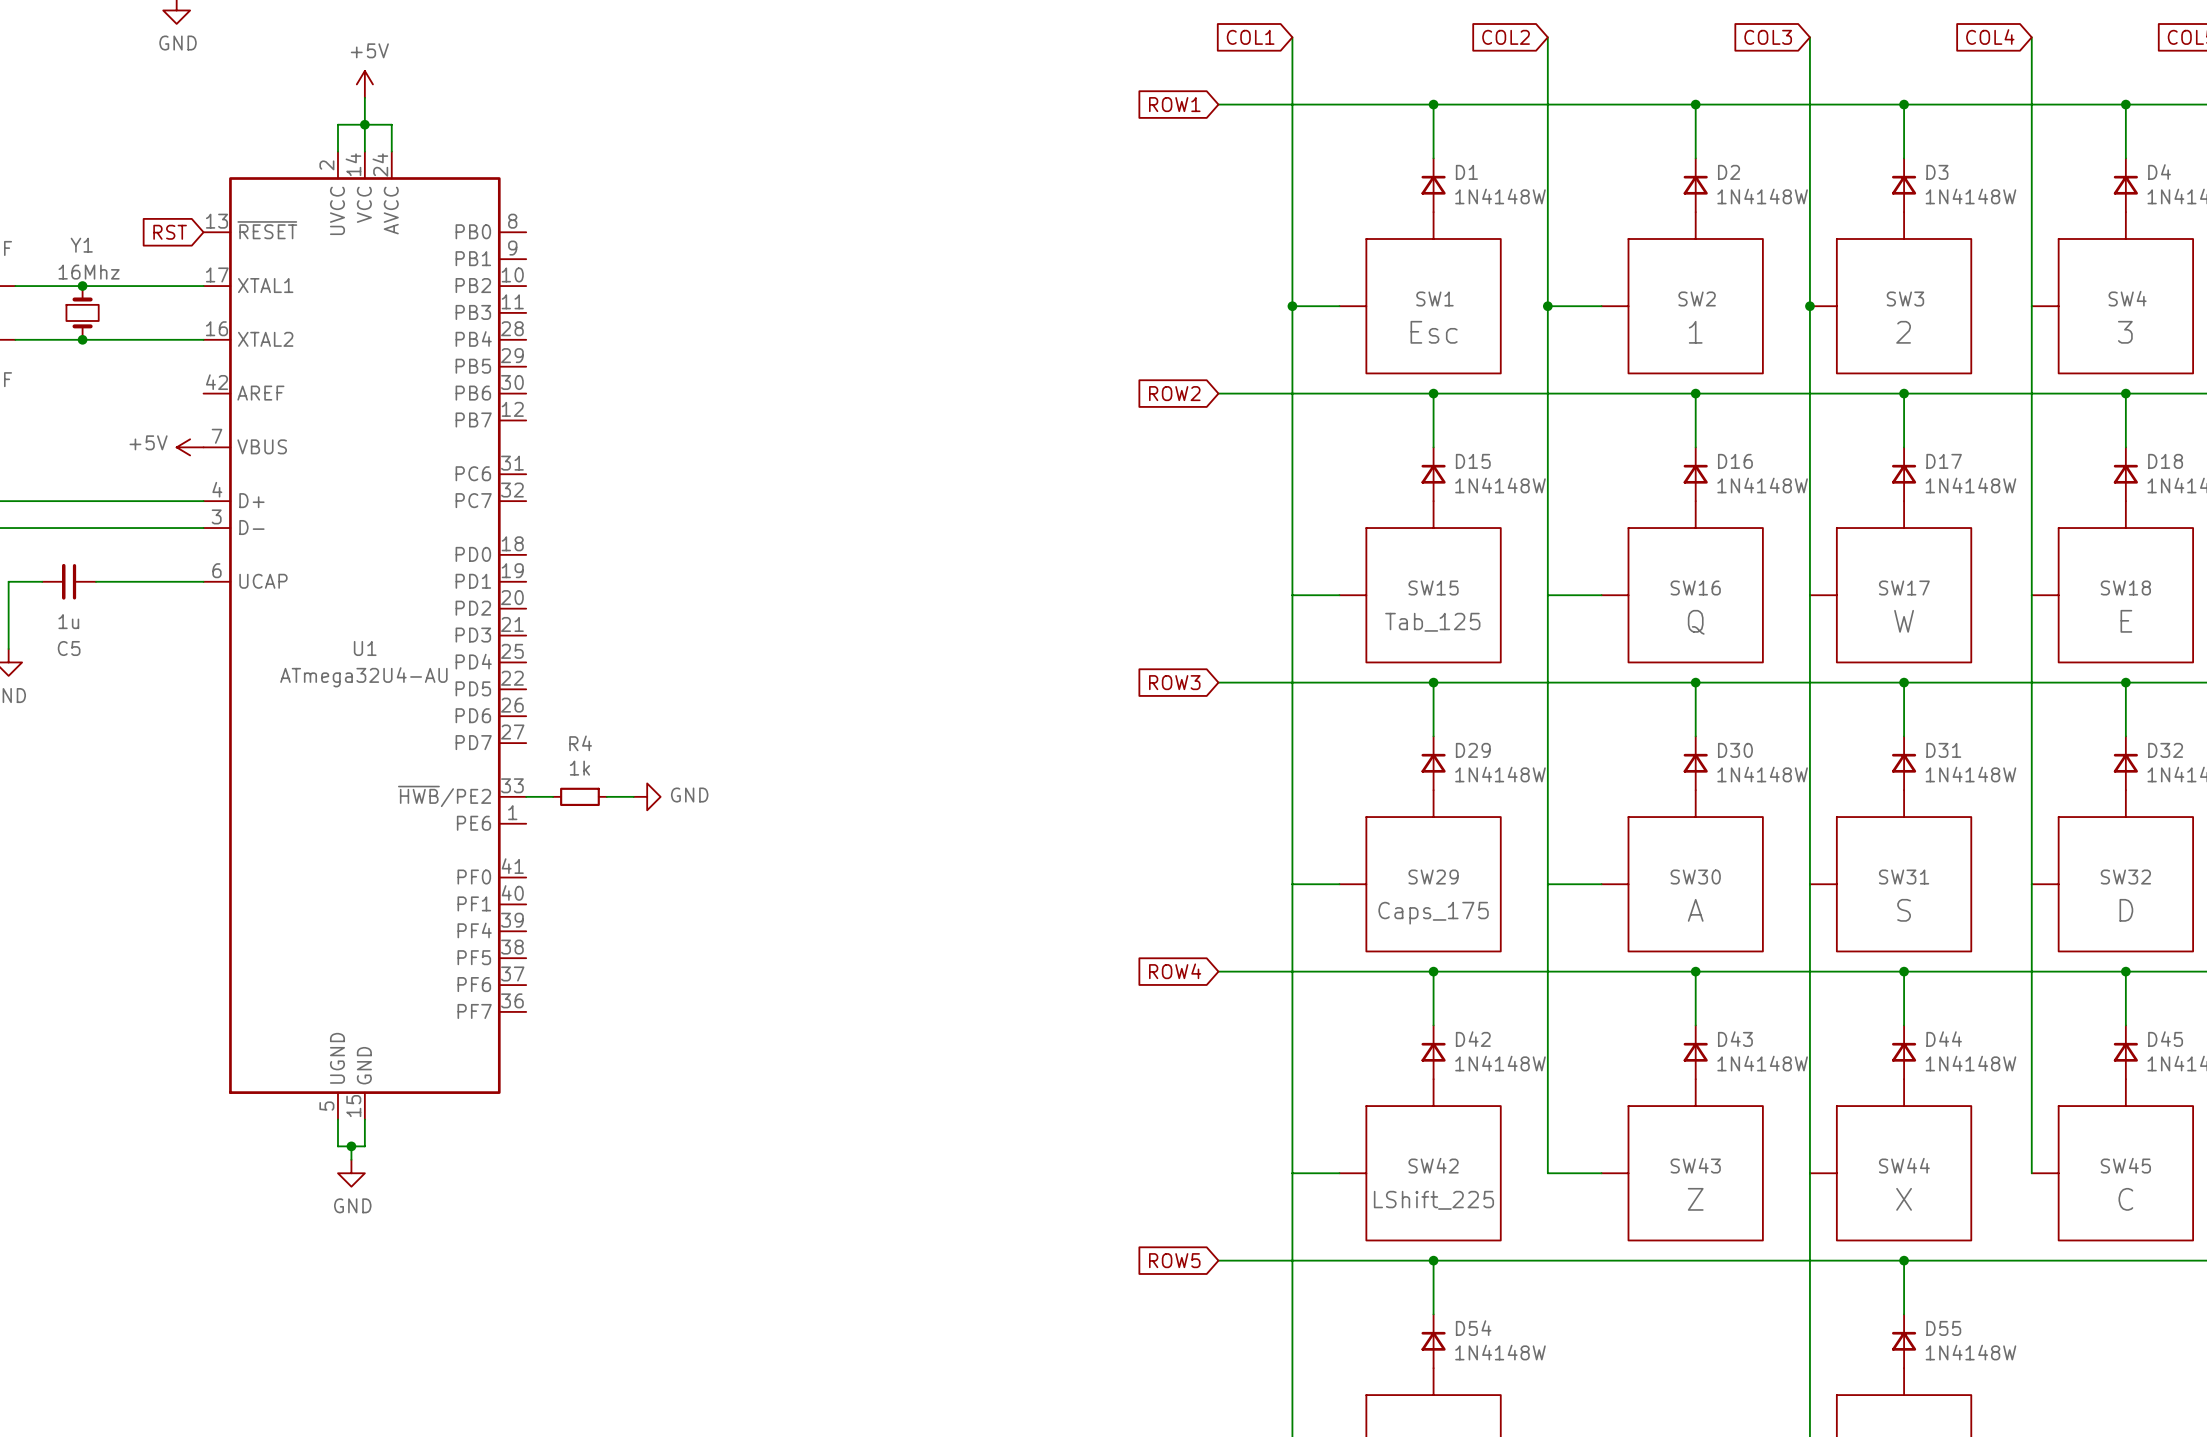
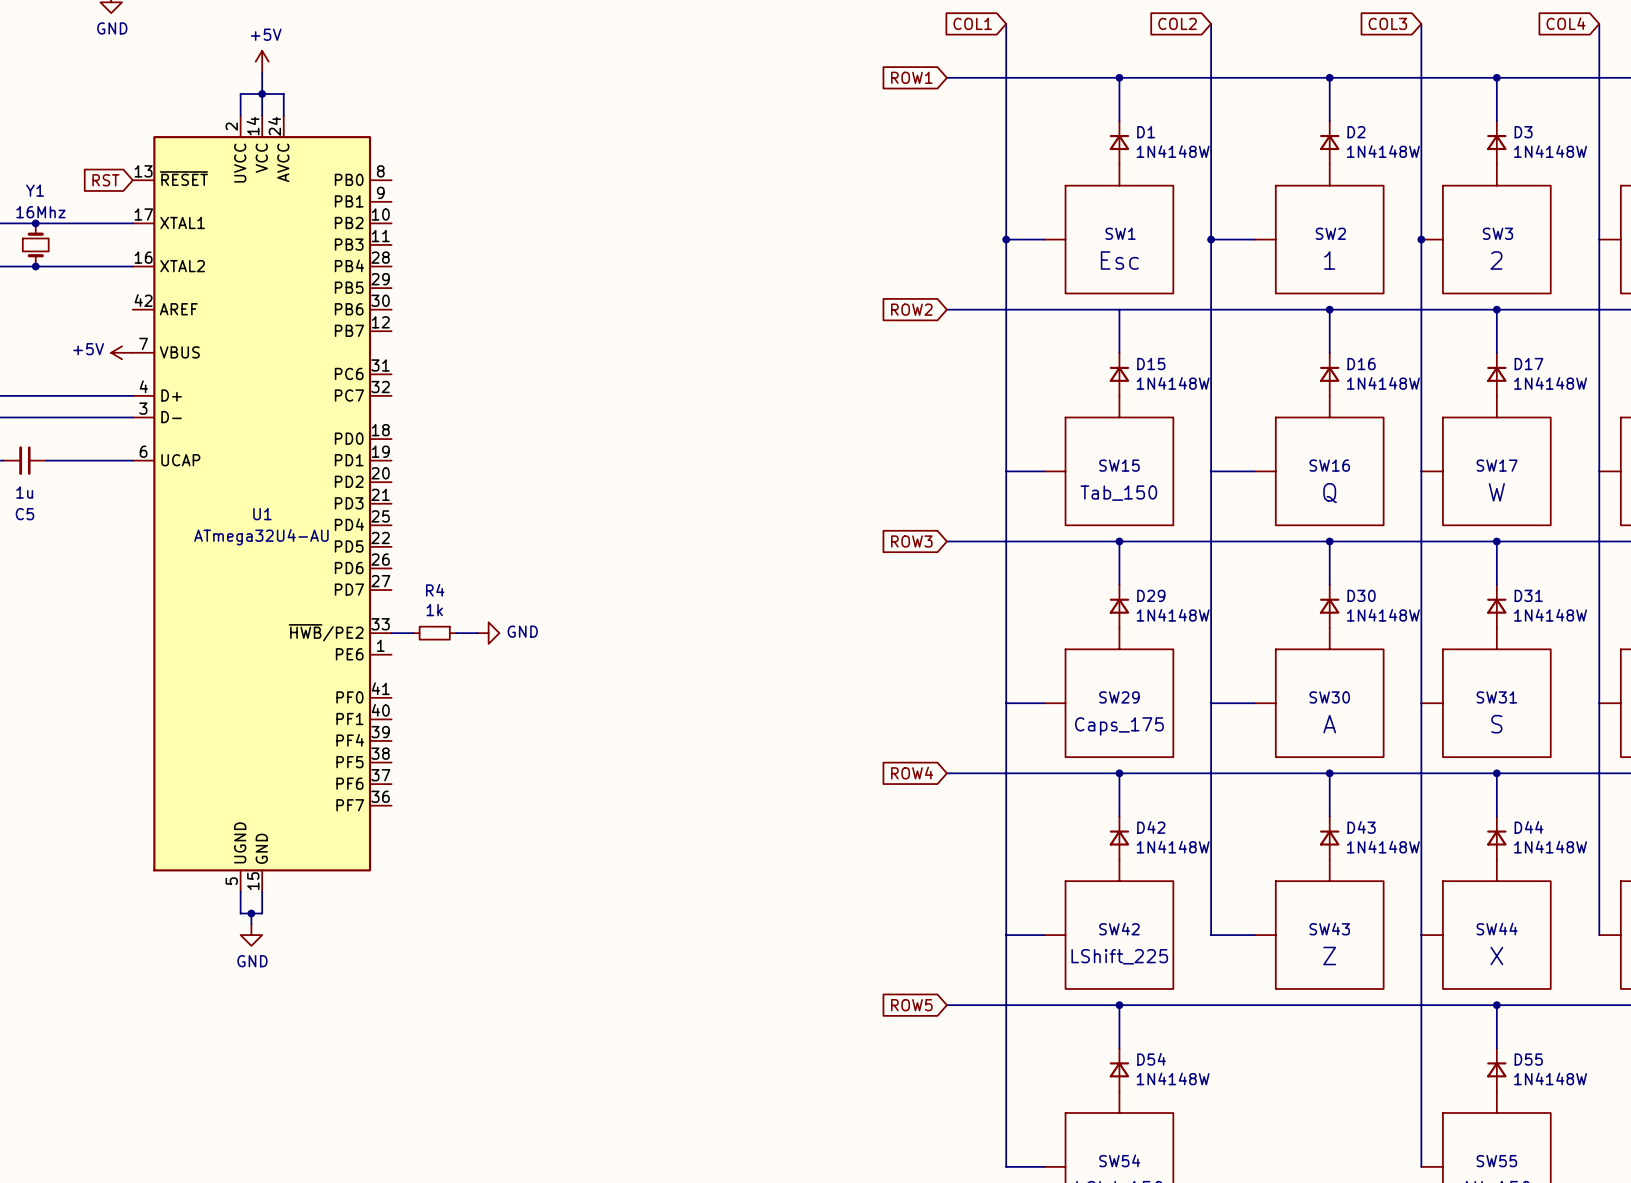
junction: (1433, 393) -> none
SW15 value: Tab_125 (1432, 622) -> Tab_150 (1118, 493)

